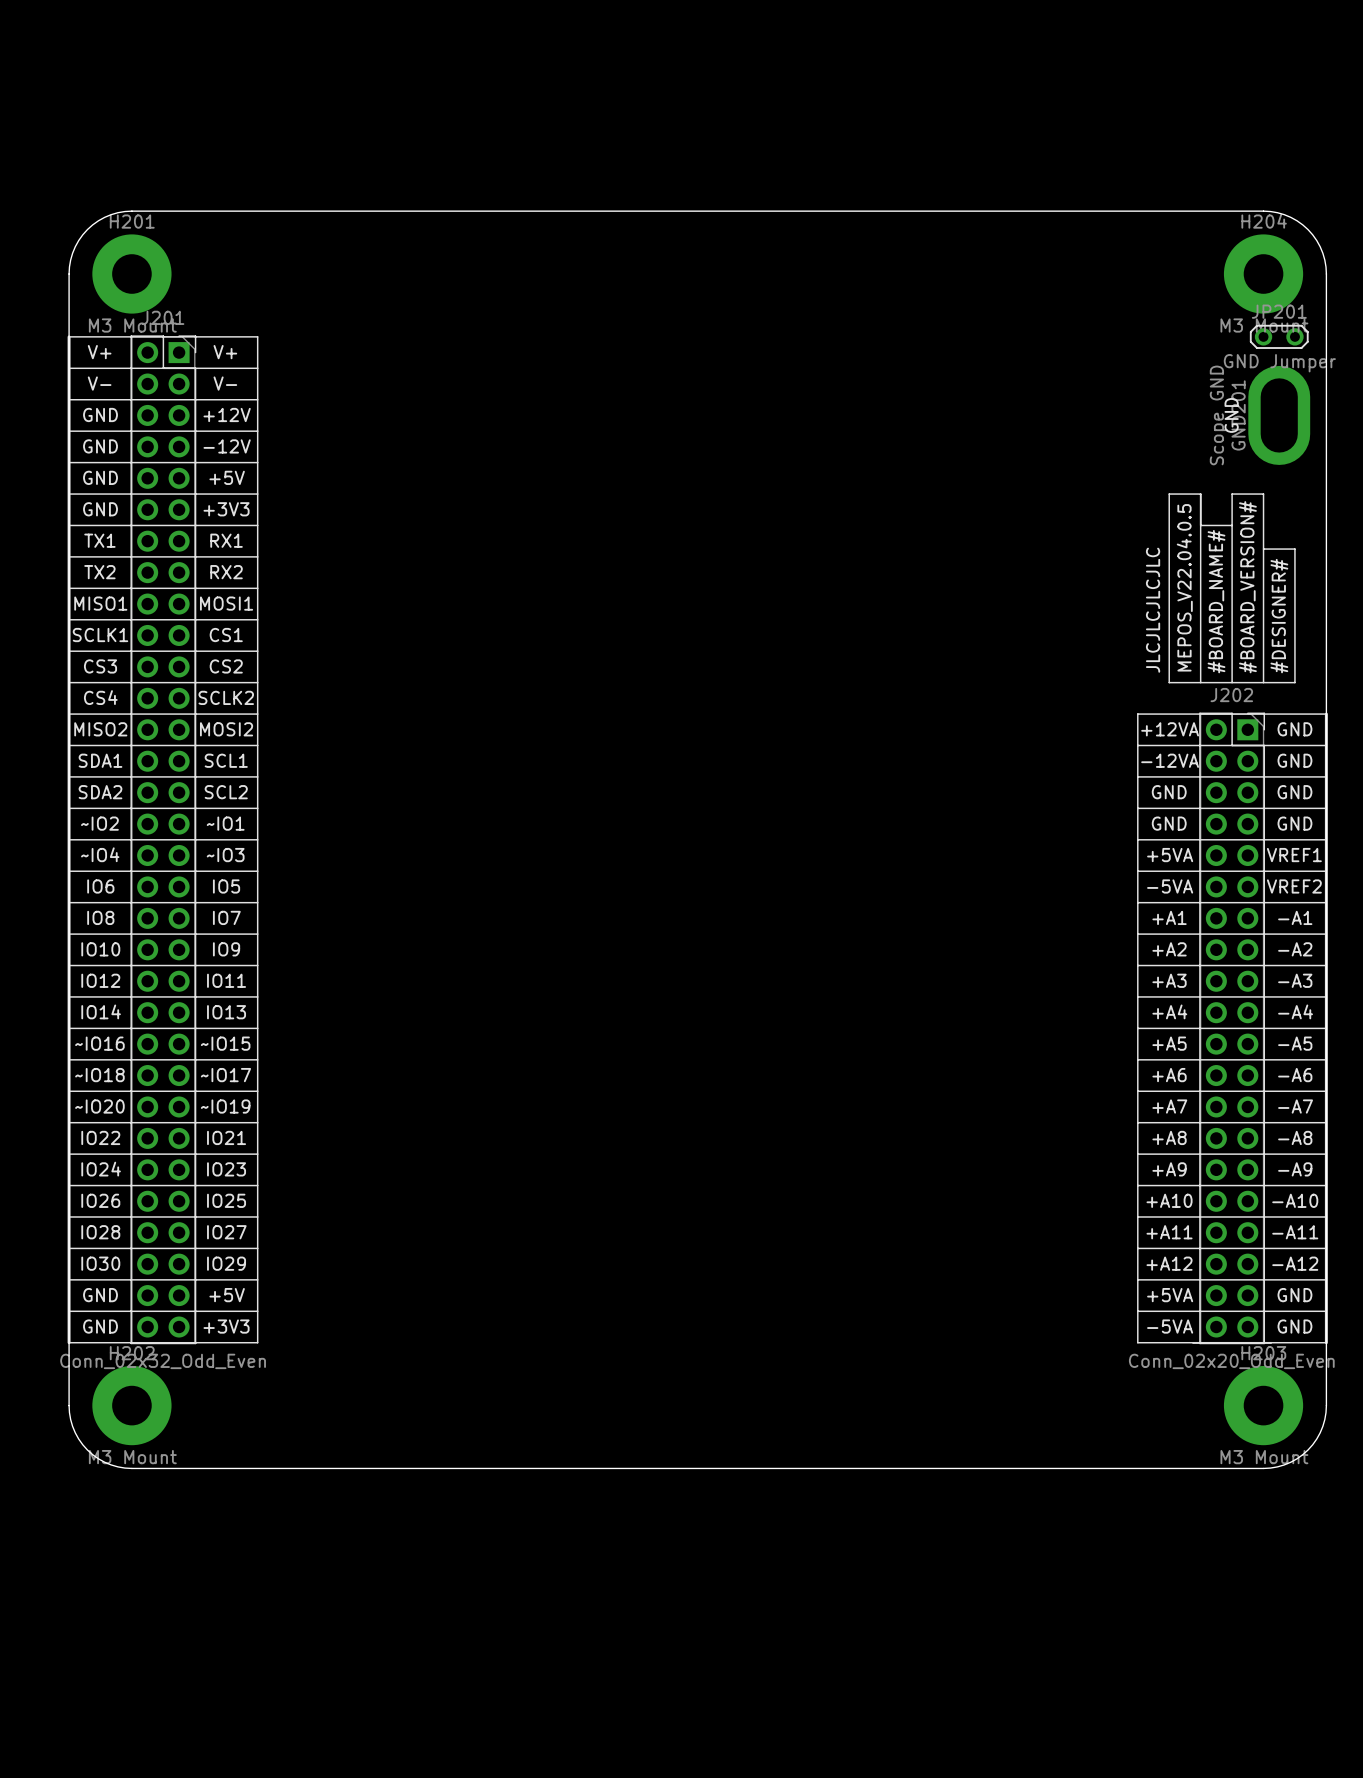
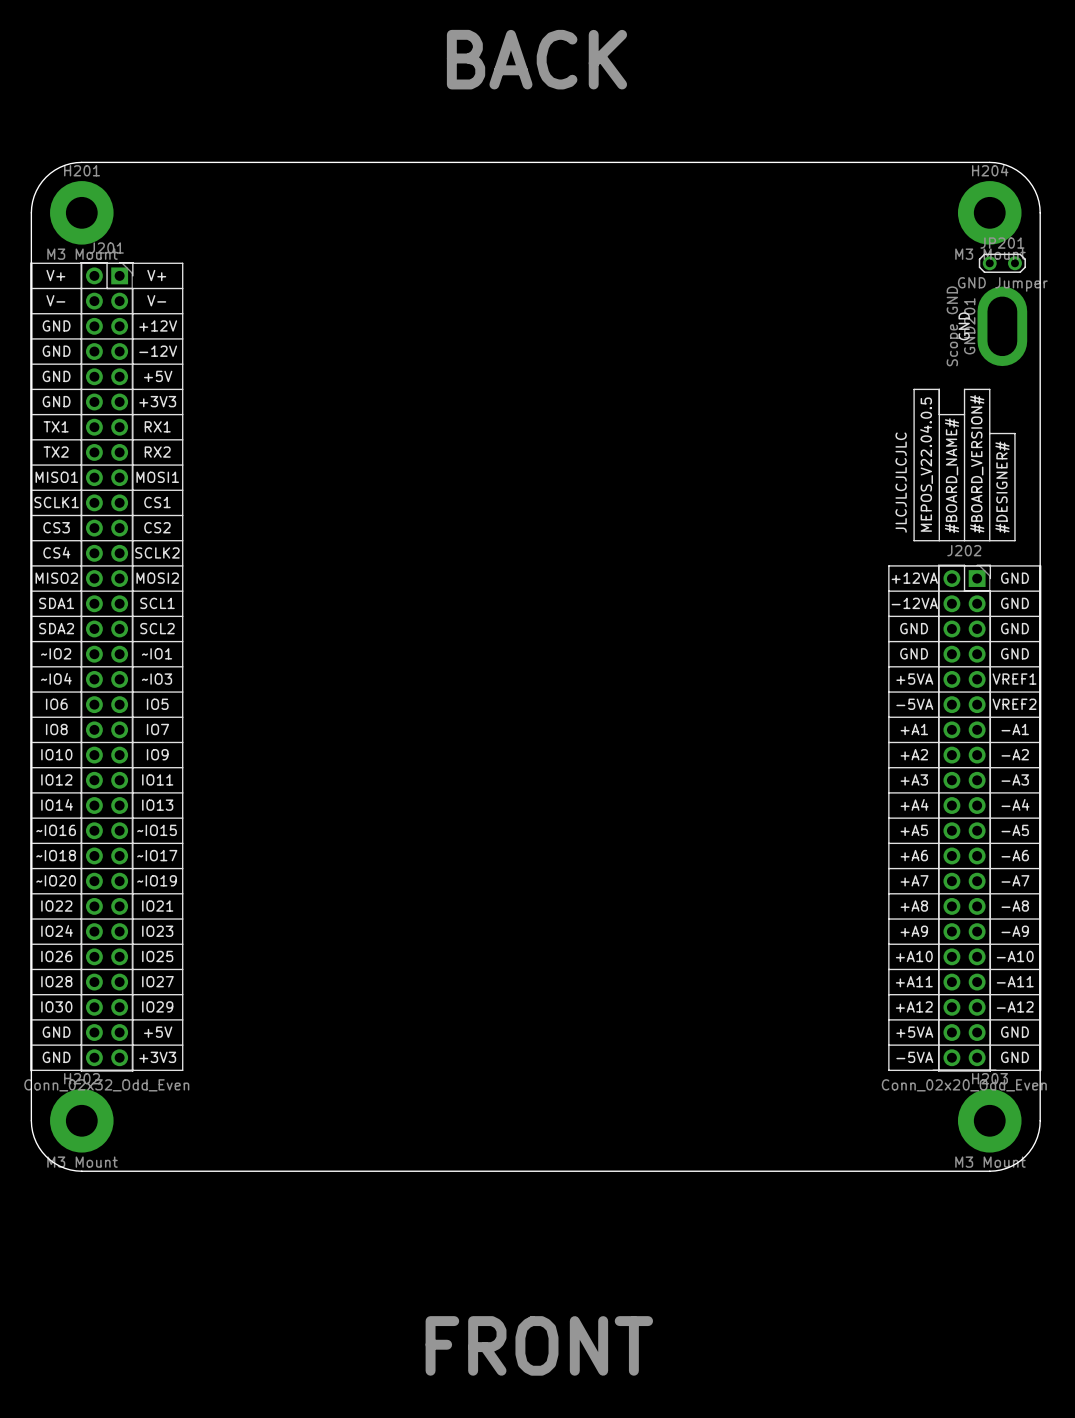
text: none -> BACK (536, 59)
text: none -> FRONT (539, 1345)

